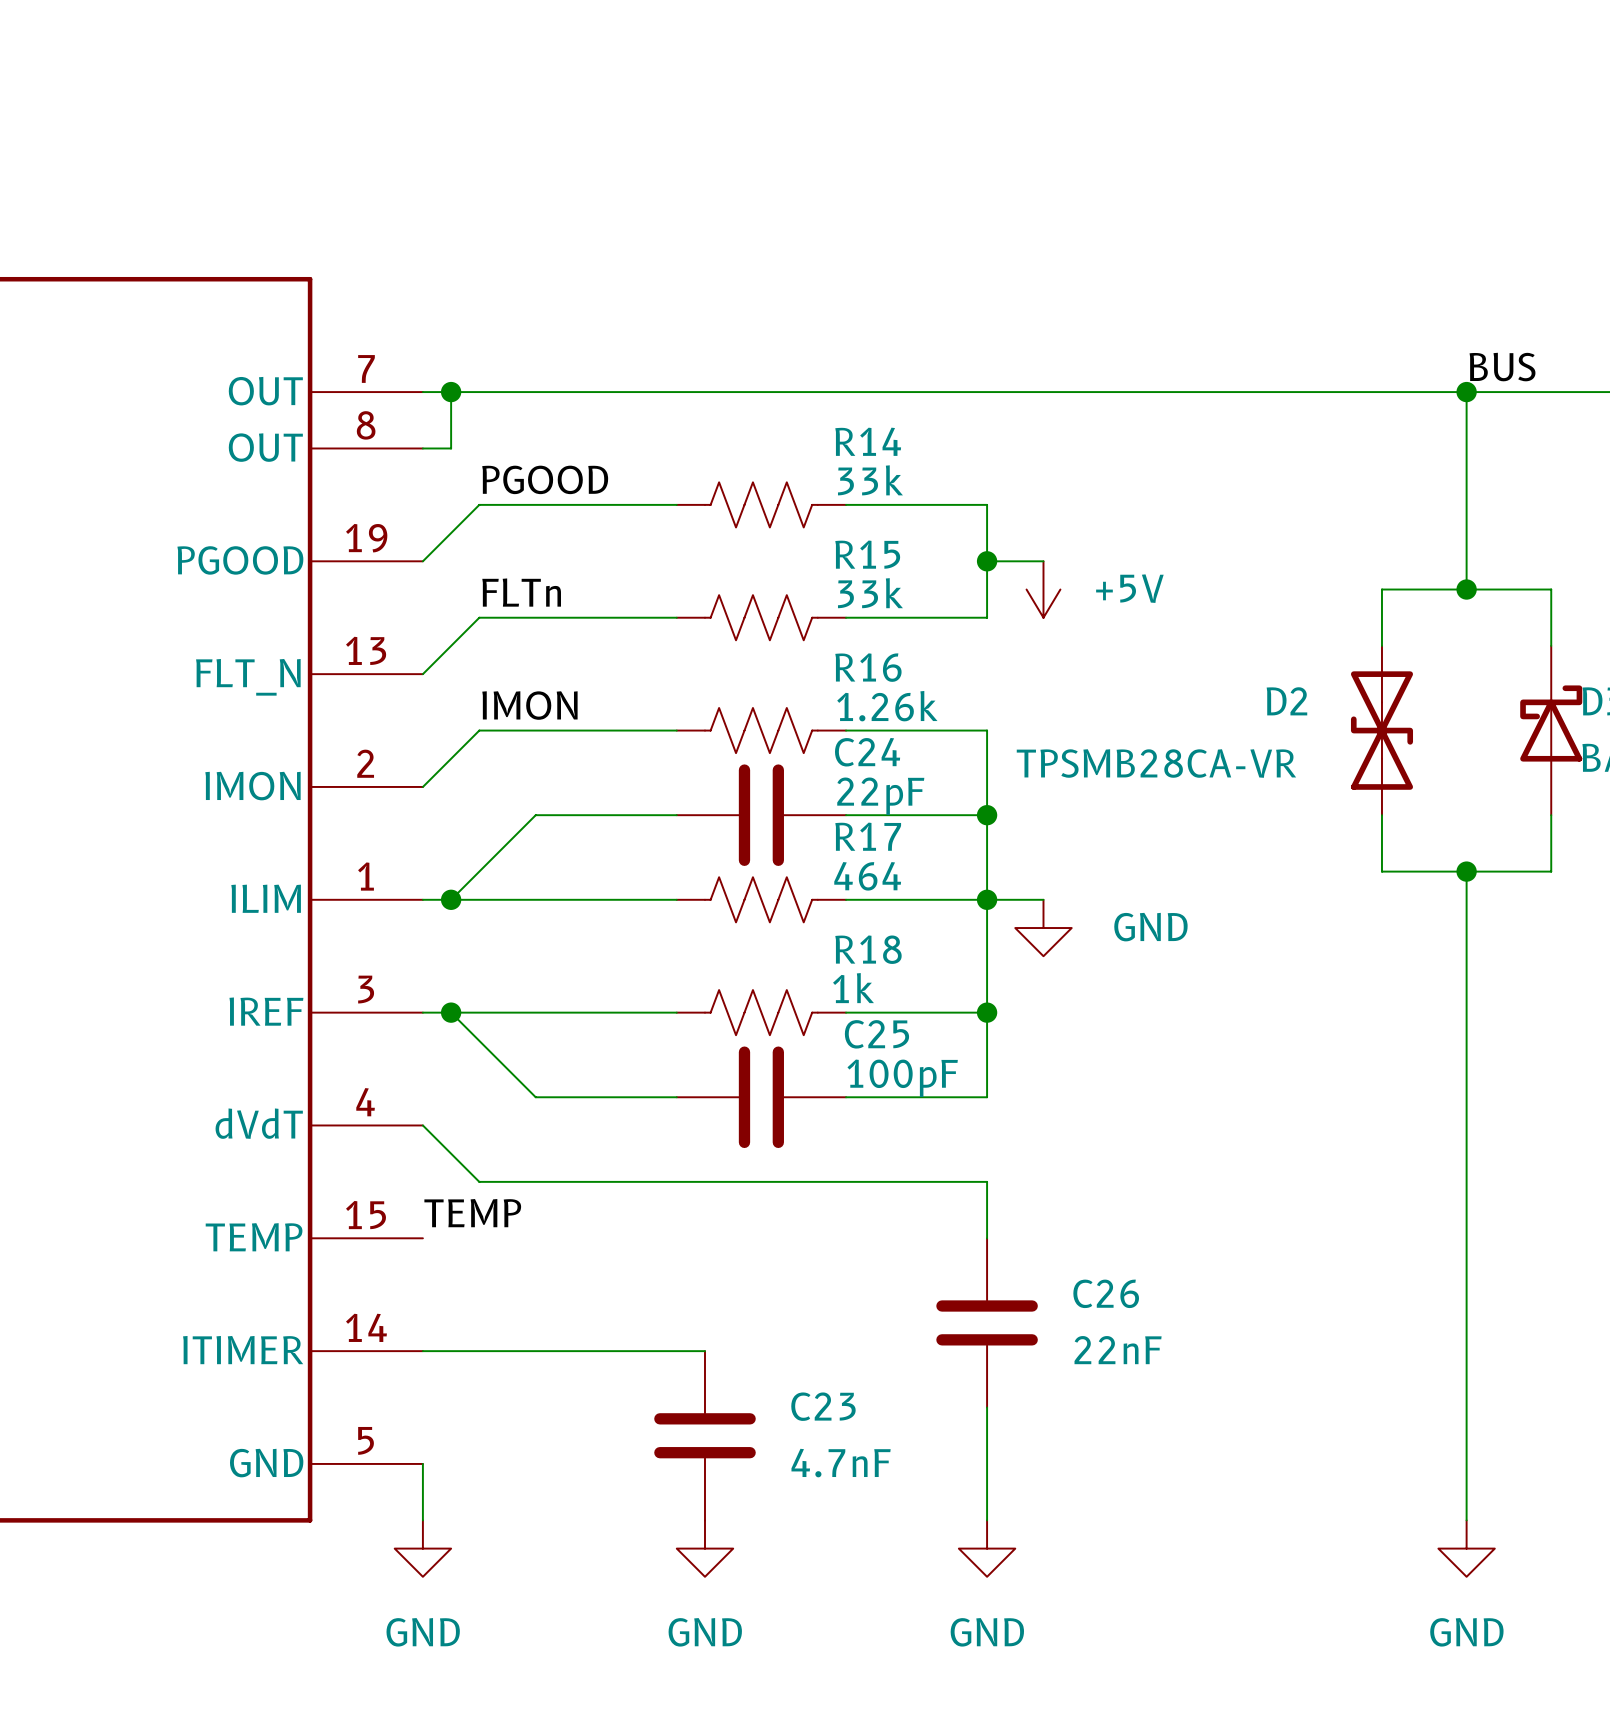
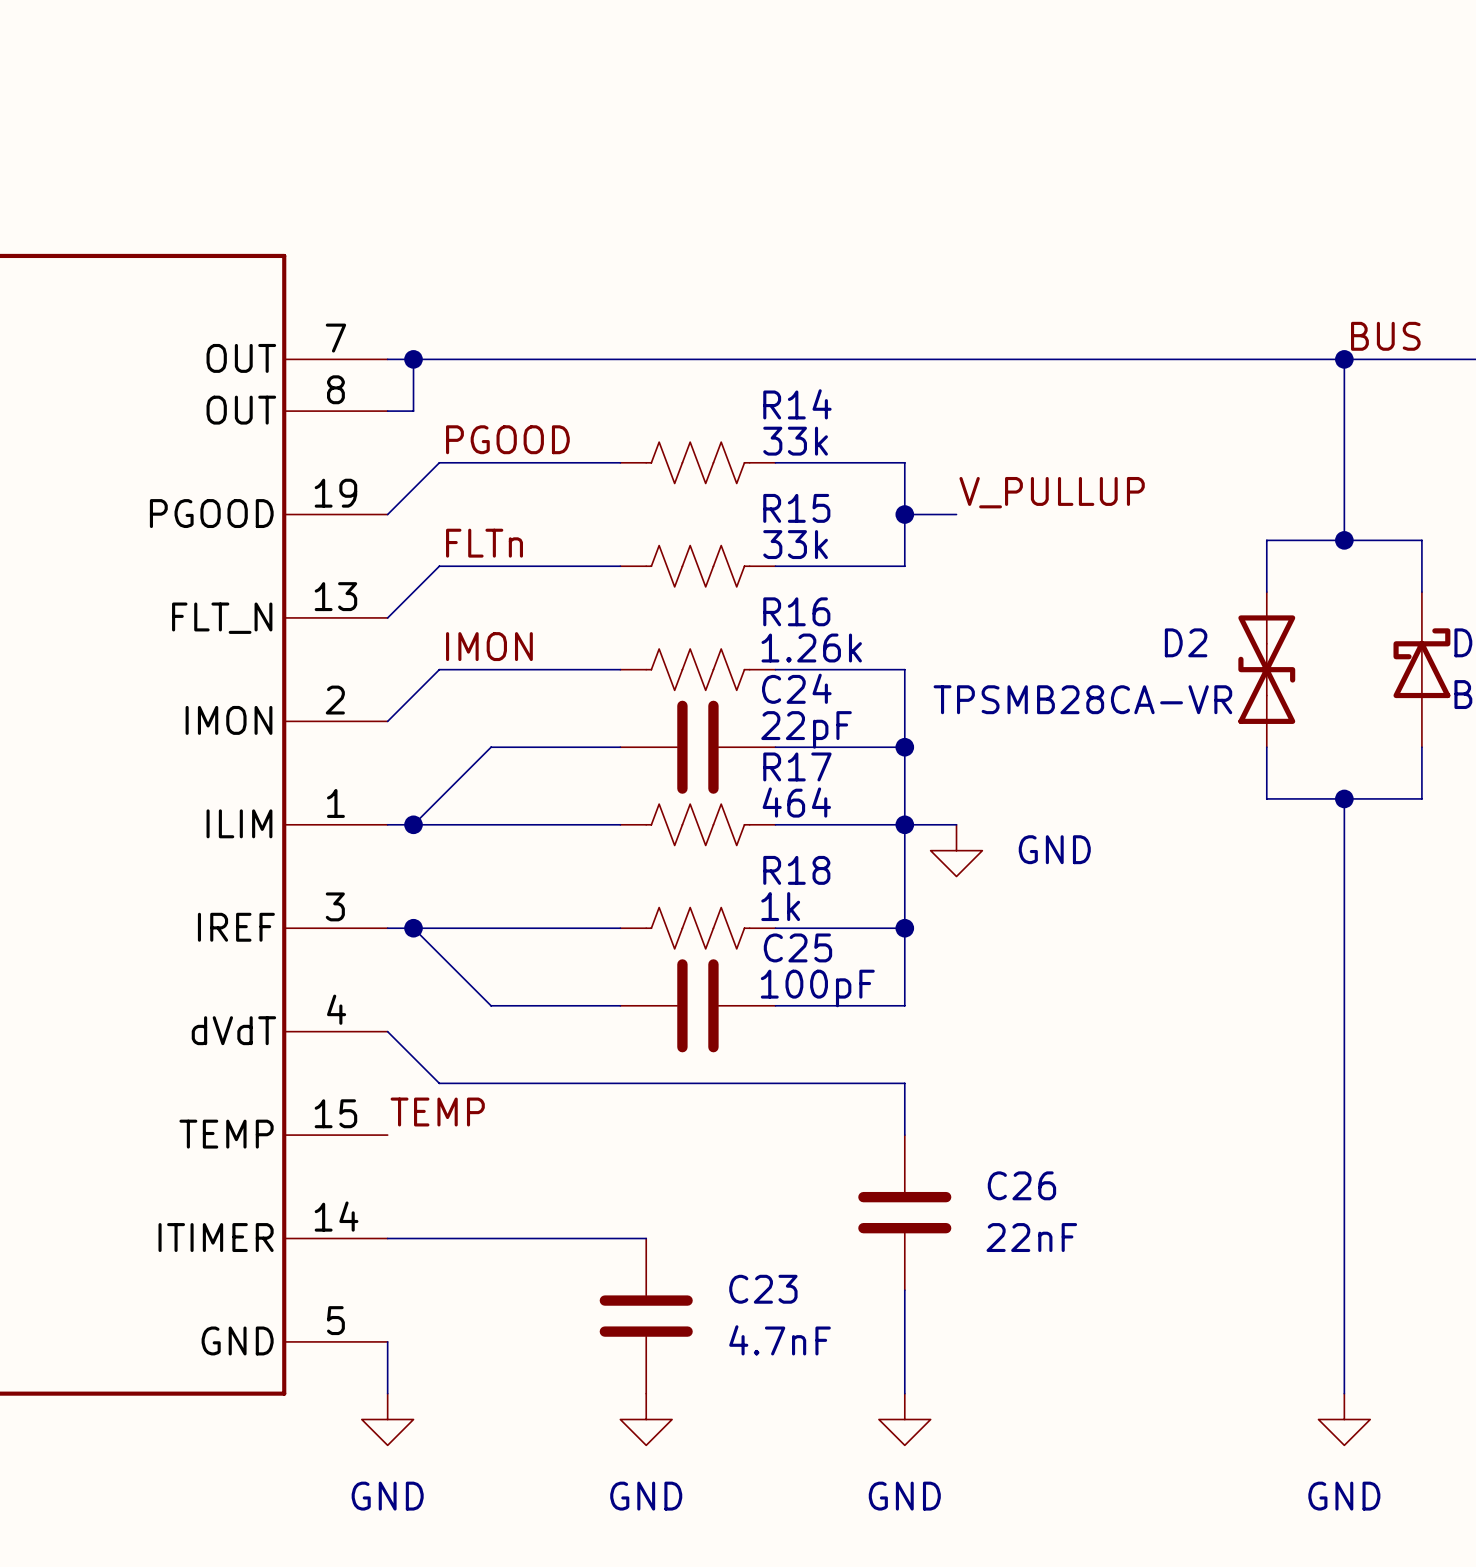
label: none -> V_PULLUP (1052, 492)
power symbol: +5V (1043, 589) -> none

